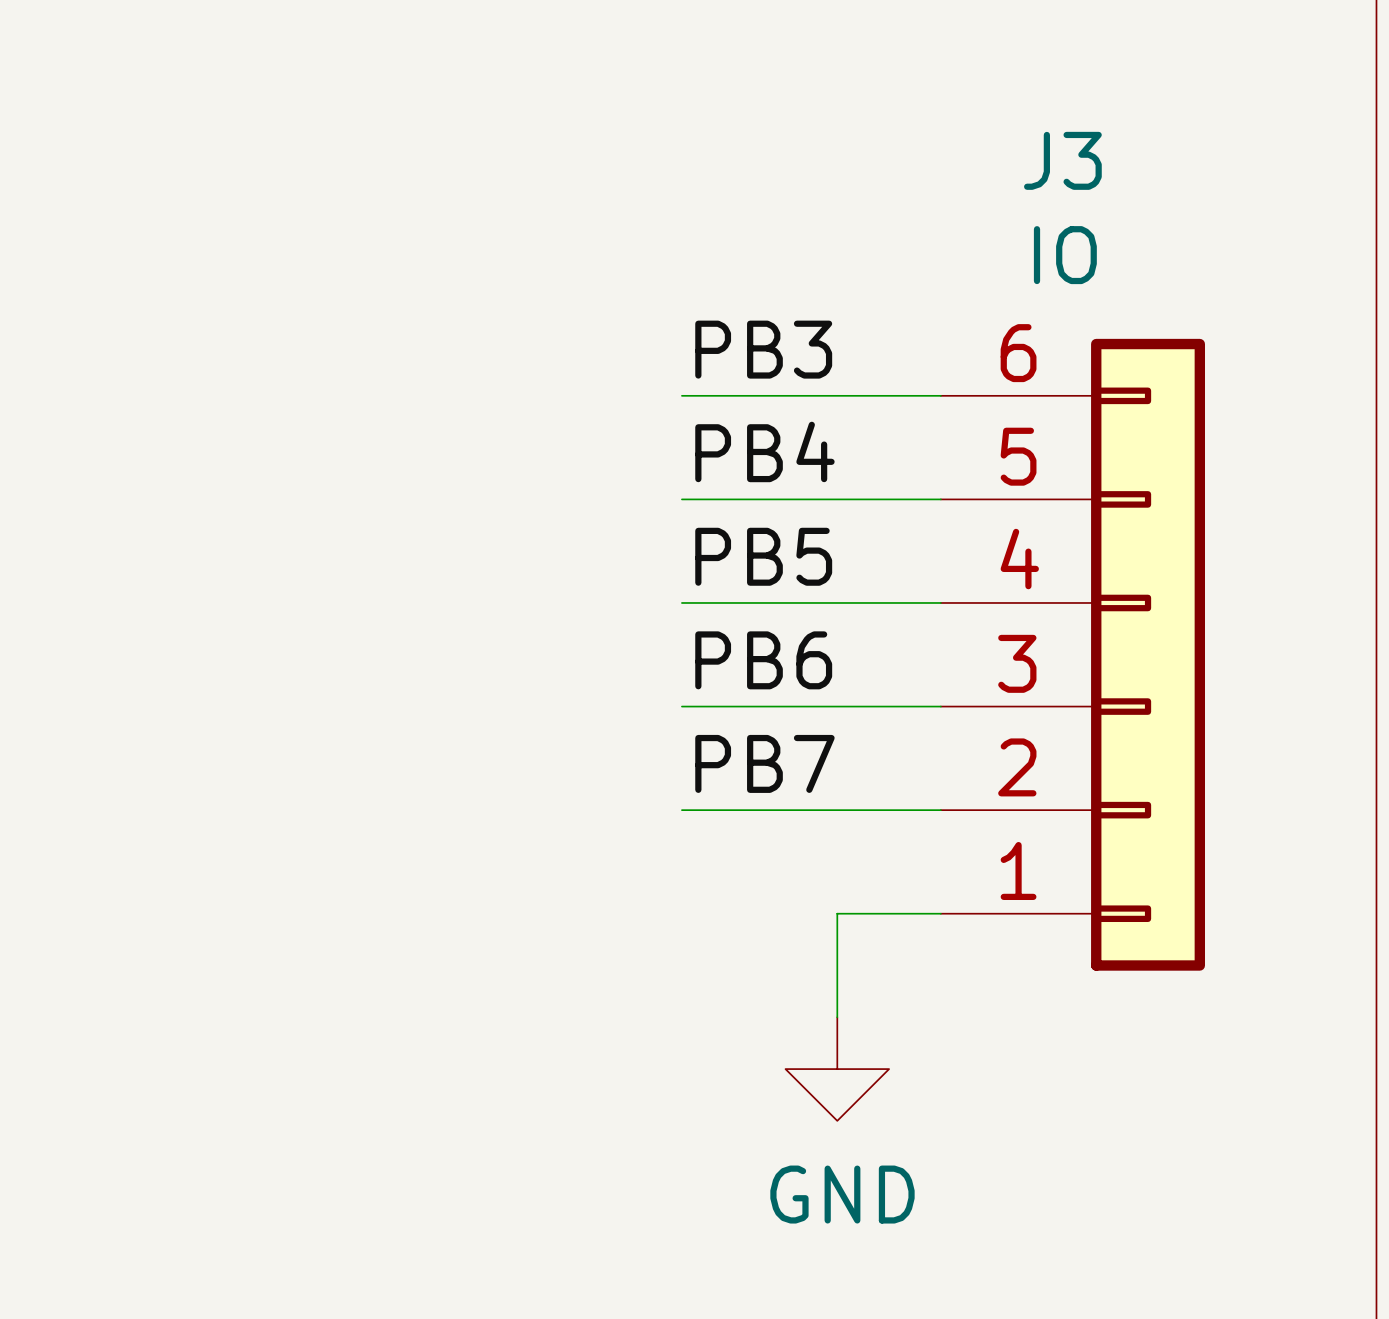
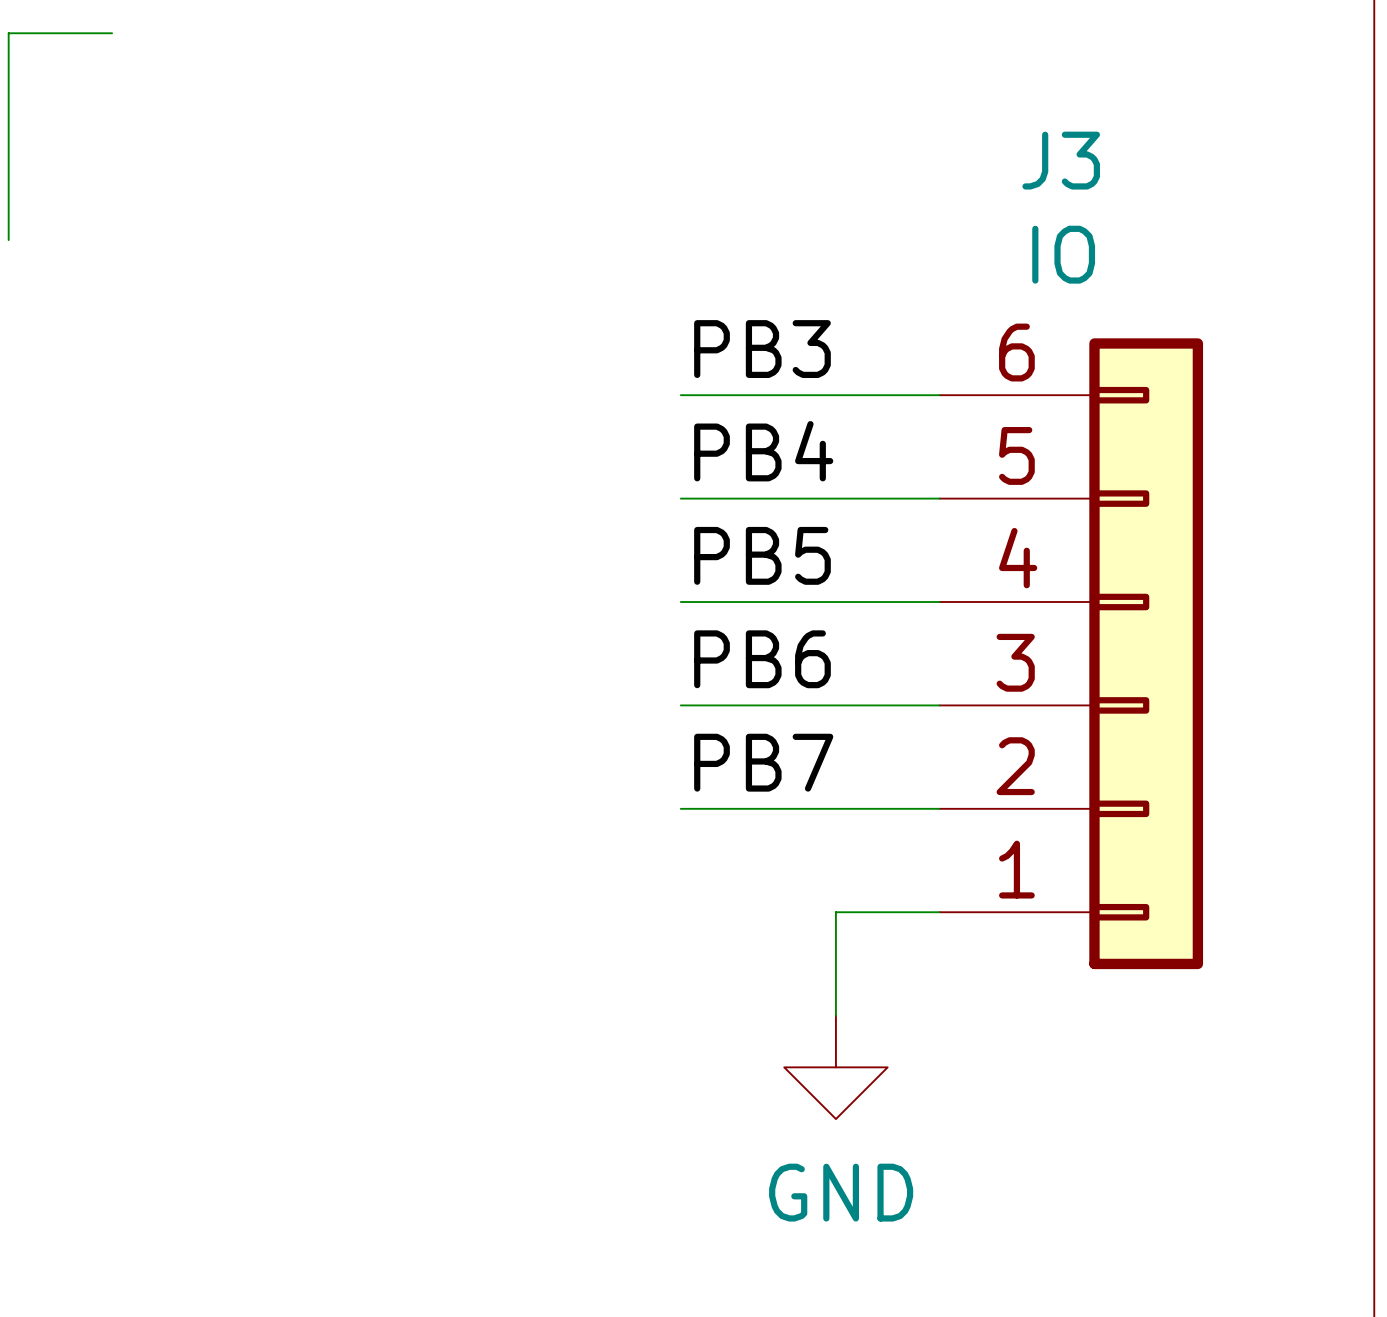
wire: none -> (112, 33) (8, 33) (8, 240)

